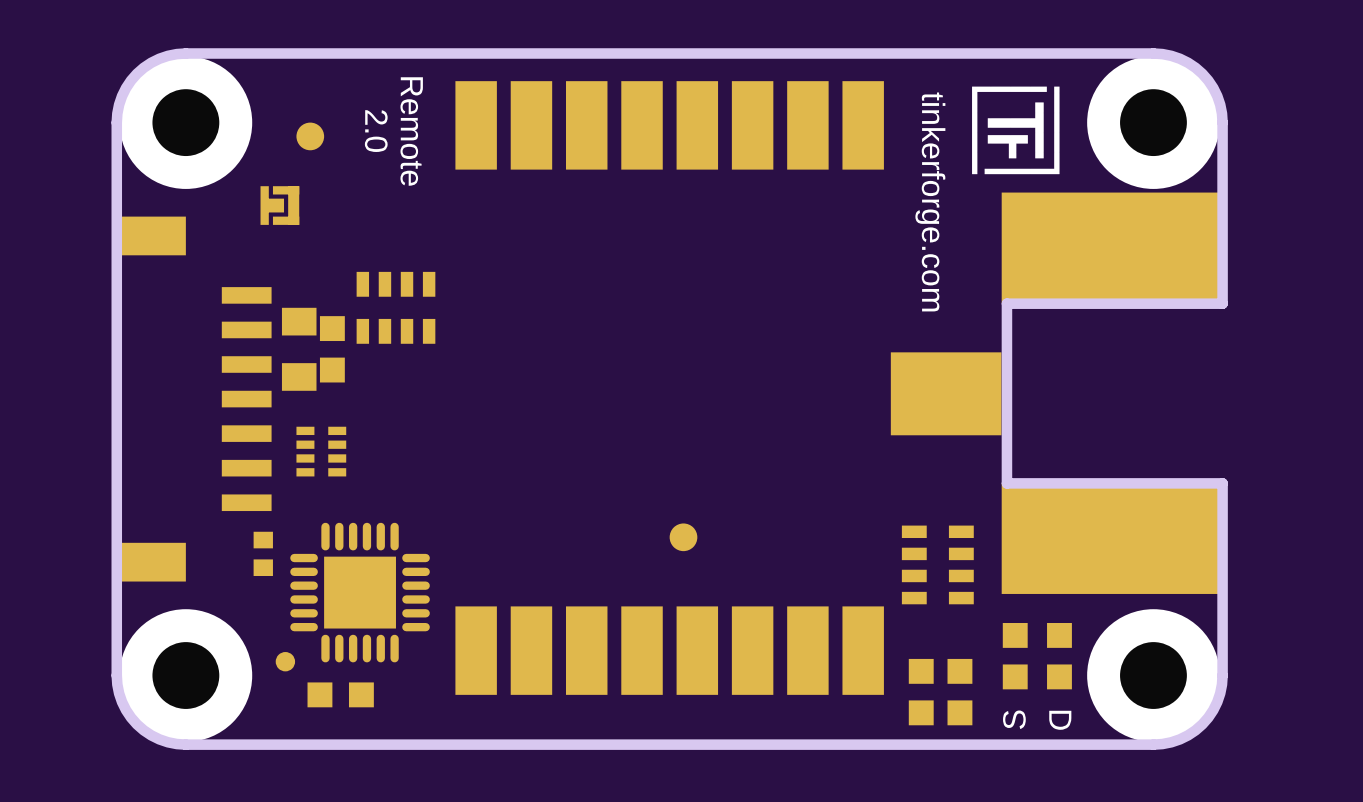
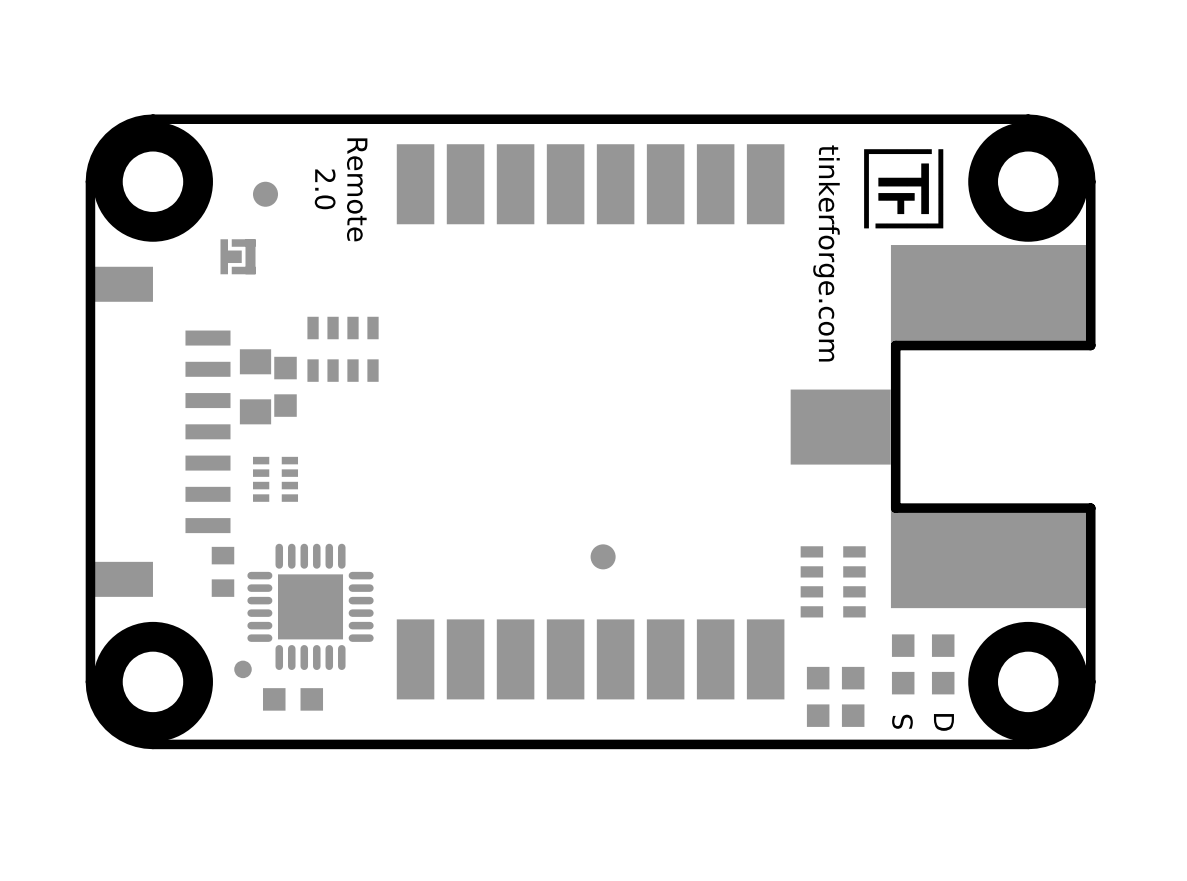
part footprint: [253, 531, 273, 577] -> [211, 546, 235, 597]

